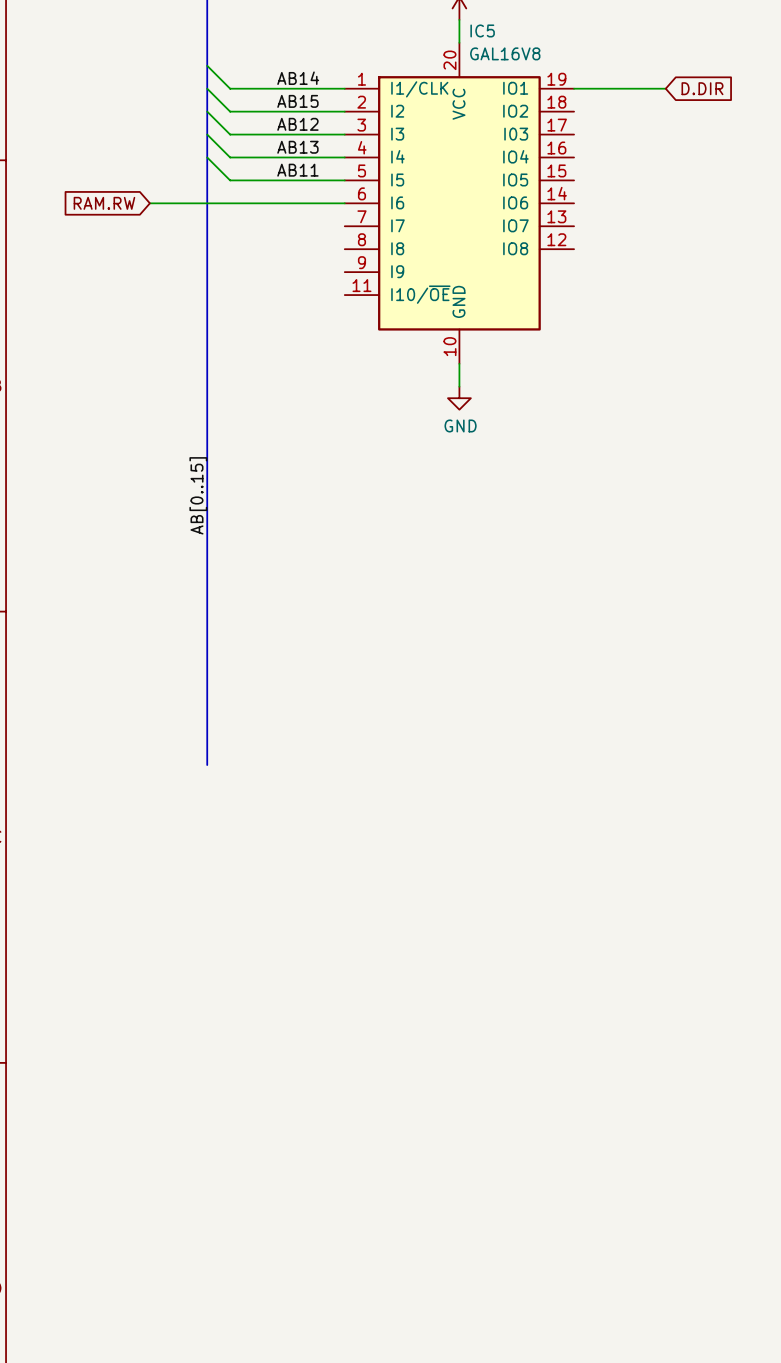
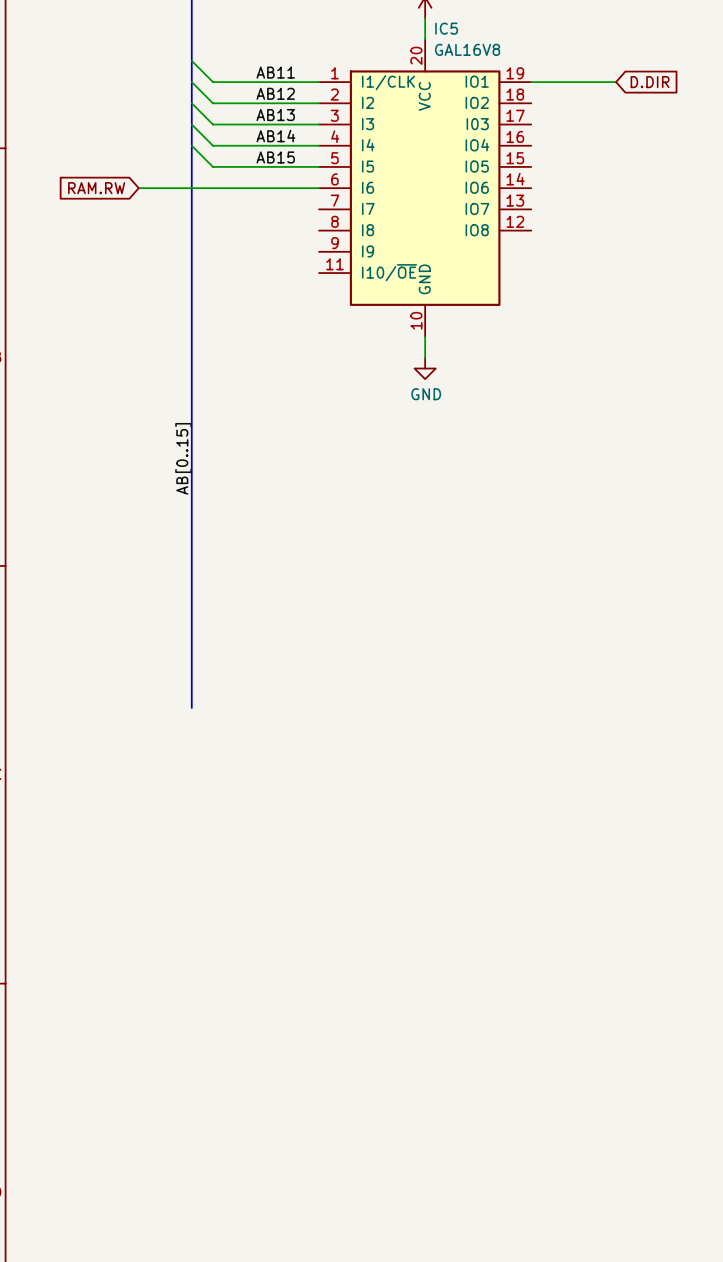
label: AB14 (298, 78) -> AB11 (275, 72)
label: AB15 (297, 101) -> AB12 (275, 93)
label: AB12 (297, 124) -> AB13 (275, 115)
label: AB13 (297, 147) -> AB14 (275, 136)
label: AB11 (297, 170) -> AB15 (275, 157)

